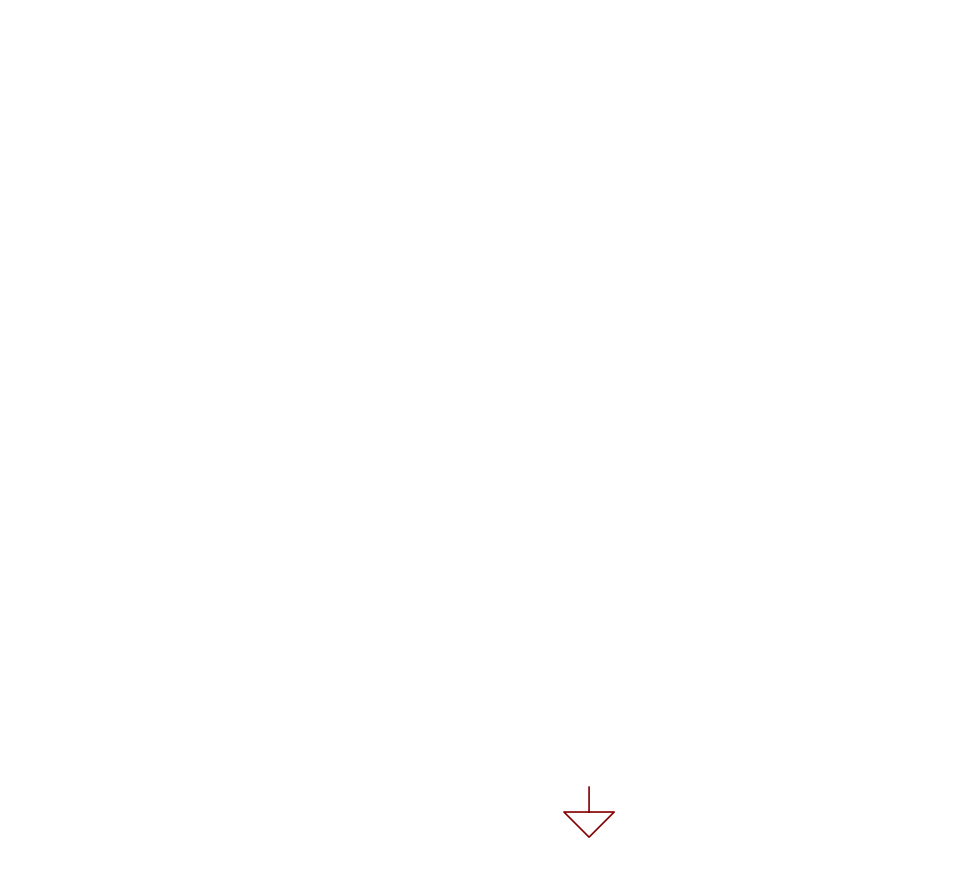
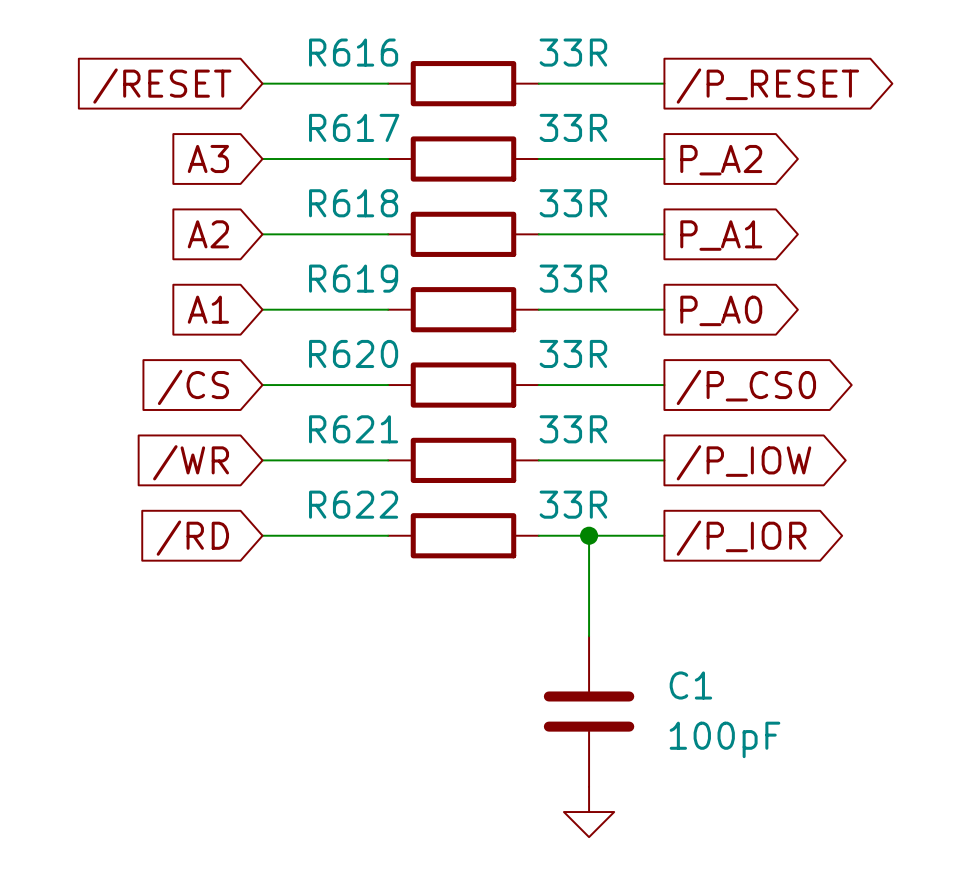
wire: none -> (262, 83) (388, 83)
R616: none -> 33R (463, 83)
wire: none -> (538, 83) (664, 83)
global label: none -> /RESET (162, 86)
global label: none -> /P_RESET (767, 86)
global label: none -> A3 (208, 159)
wire: none -> (262, 159) (388, 159)
R617: none -> 33R (463, 159)
wire: none -> (538, 159) (664, 159)
global label: none -> P_A2 (721, 160)
global label: none -> A2 (208, 234)
wire: none -> (262, 234) (388, 234)
R618: none -> 33R (463, 234)
wire: none -> (538, 234) (664, 234)
global label: none -> P_A1 (721, 235)
global label: none -> A1 (208, 309)
wire: none -> (262, 309) (388, 309)
R619: none -> 33R (463, 309)
wire: none -> (538, 309) (664, 309)
global label: none -> P_A0 (721, 310)
wire: none -> (262, 385) (388, 385)
R620: none -> 33R (463, 385)
wire: none -> (538, 385) (664, 385)
global label: none -> /CS (193, 387)
global label: none -> /P_CS0 (746, 387)
wire: none -> (262, 460) (388, 460)
R621: none -> 33R (463, 460)
wire: none -> (538, 460) (664, 460)
global label: none -> /WR (191, 462)
global label: none -> /P_IOW (743, 462)
wire: none -> (262, 535) (388, 535)
R622: none -> 33R (463, 535)
wire: none -> (538, 535) (664, 535)
wire: none -> (589, 535) (589, 636)
junction: none -> (589, 535)
global label: none -> /RD (192, 538)
global label: none -> /P_IOR (741, 538)
C1: none -> 100pF (589, 711)

